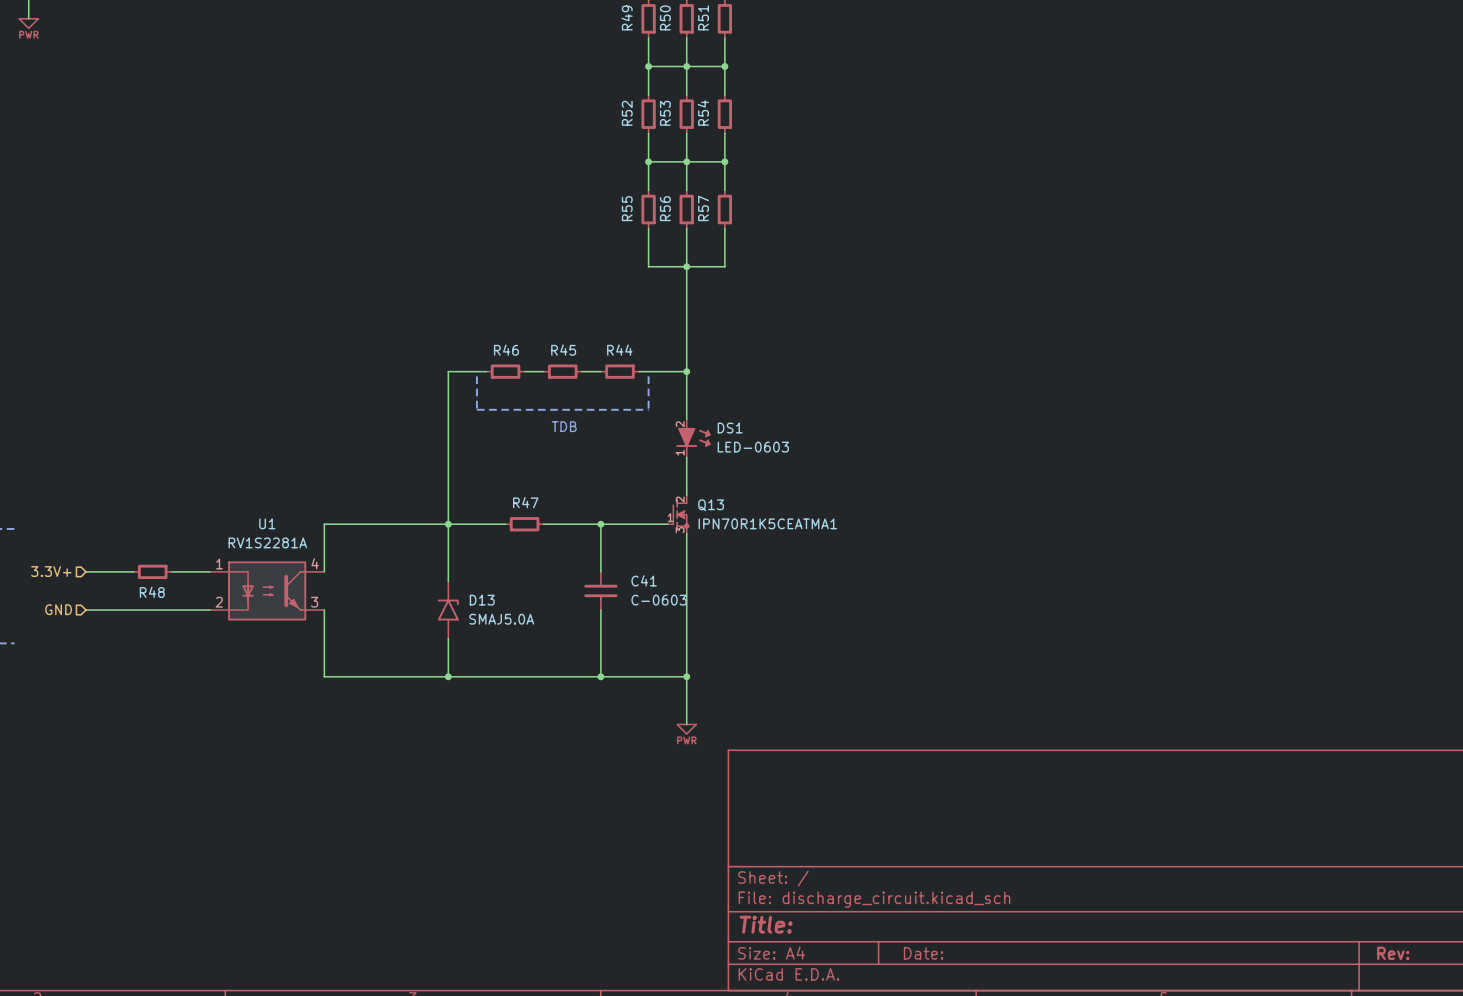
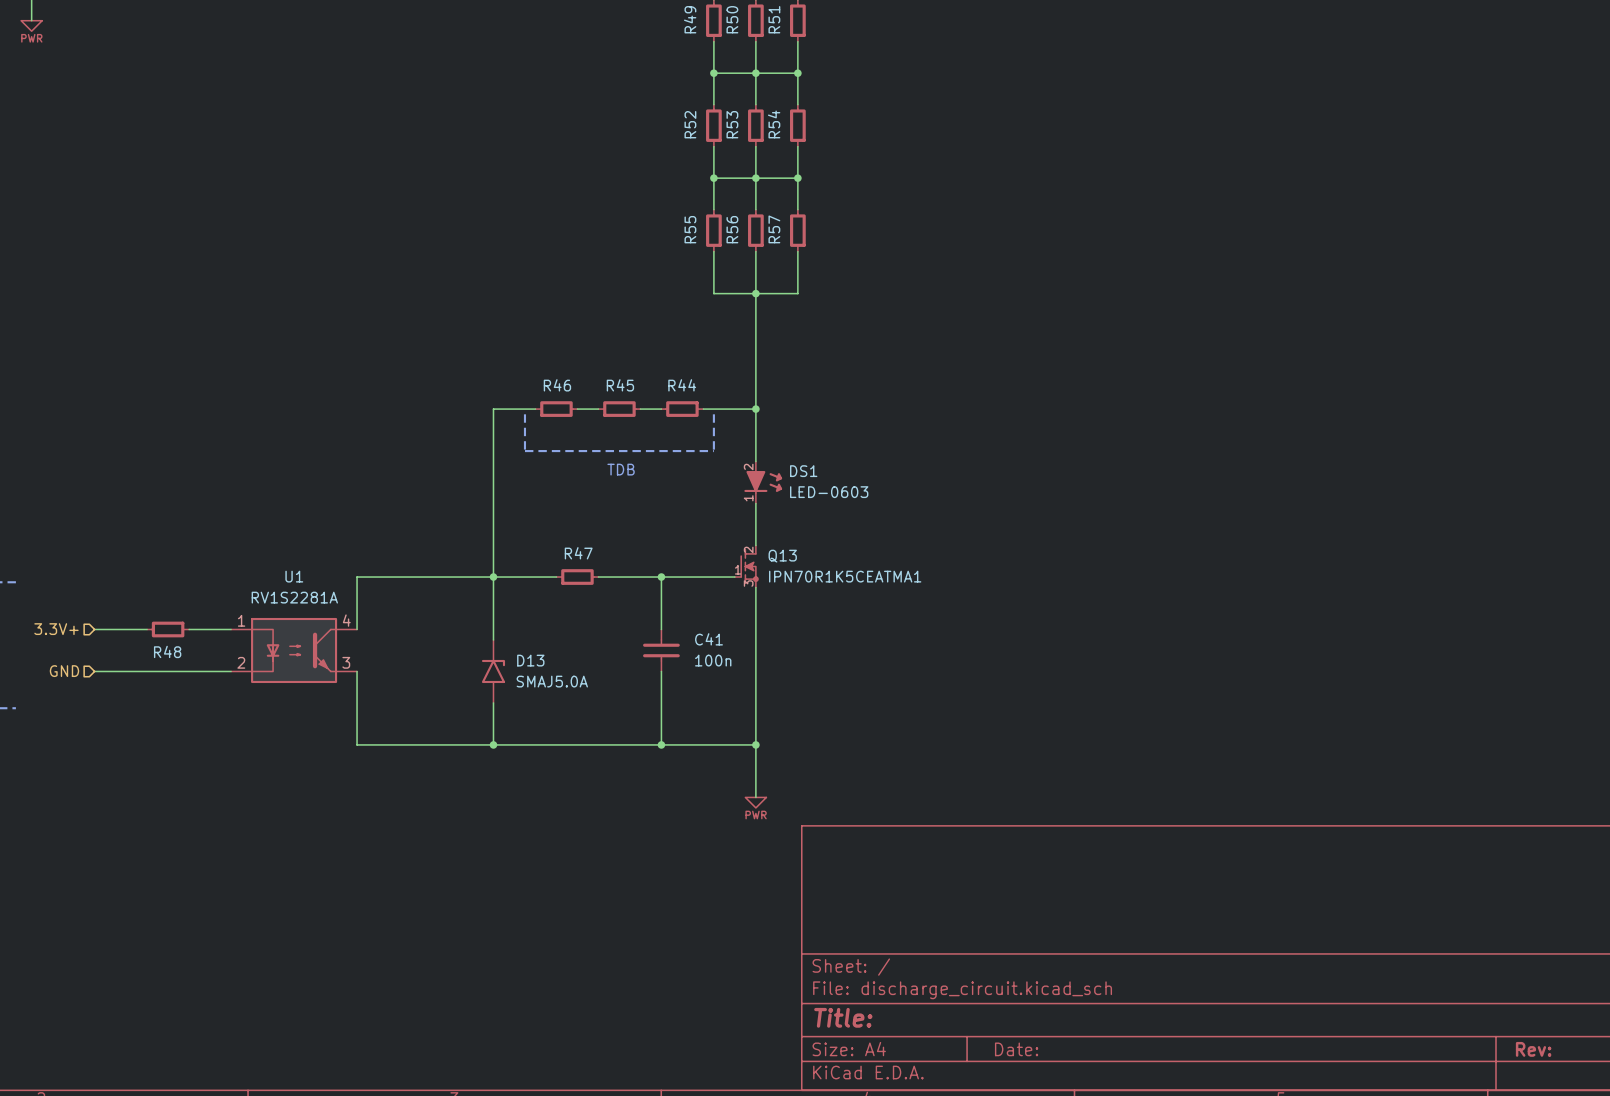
C41 value: C-0603 (659, 600) -> 100n (713, 660)

